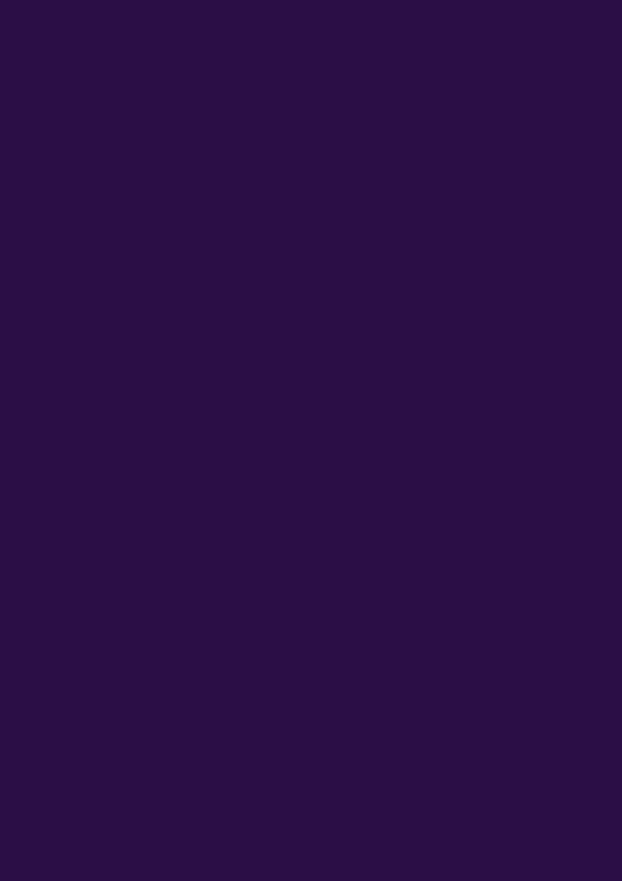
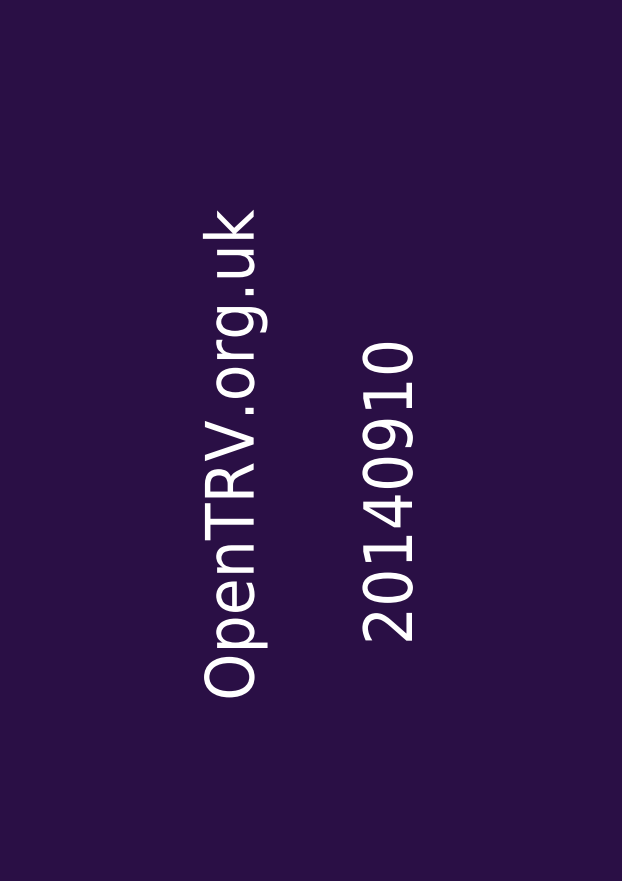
text: none -> OpenTRV.org.uk (235, 453)
text: none -> 20140910 (387, 491)

